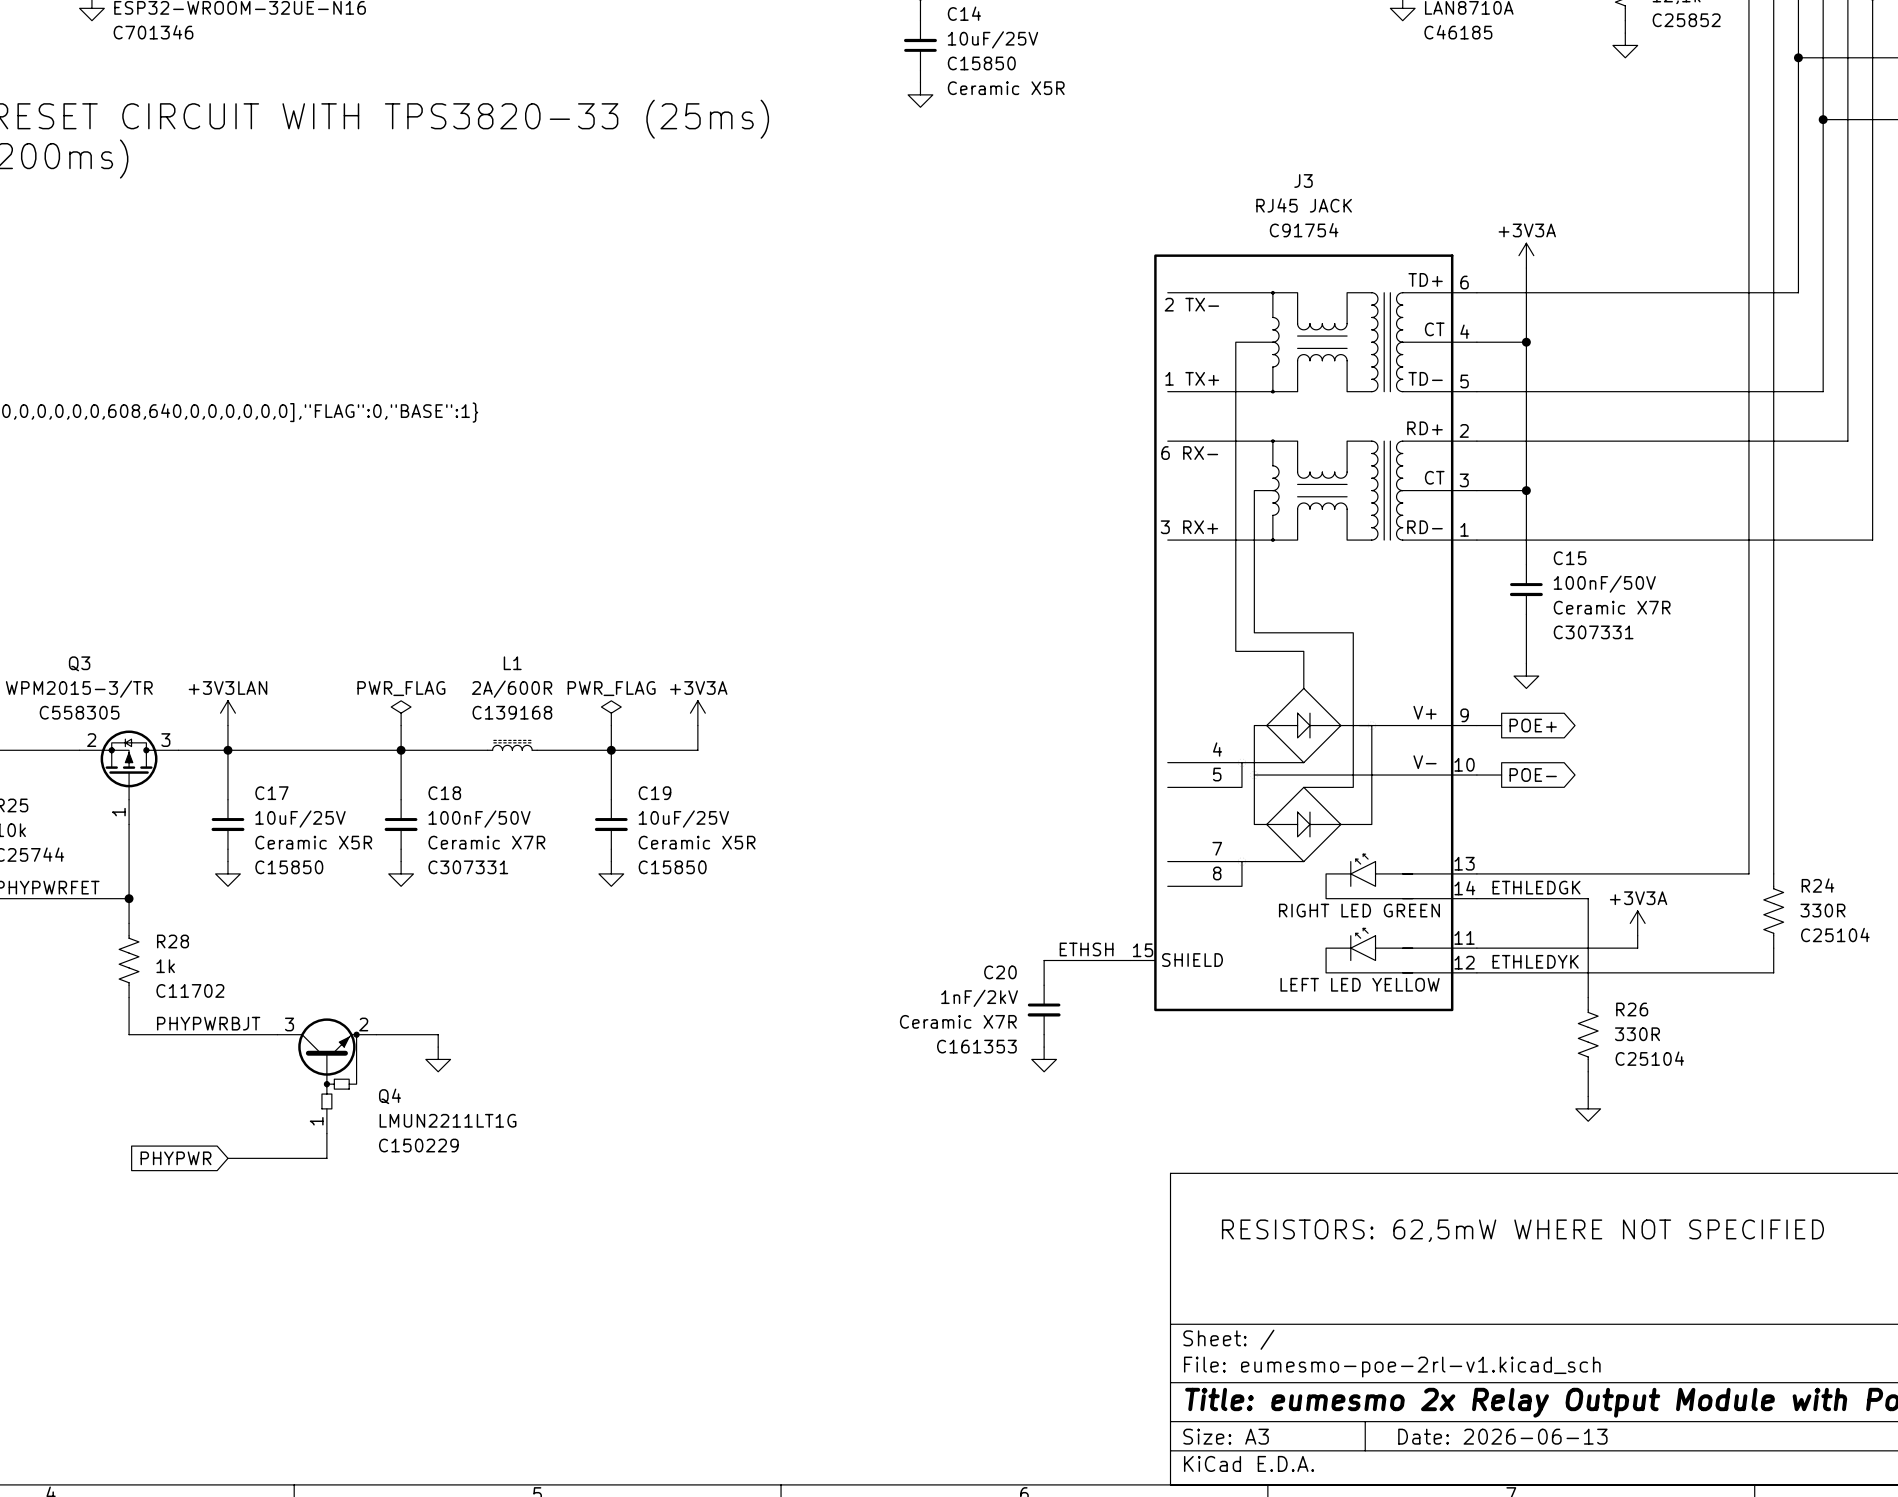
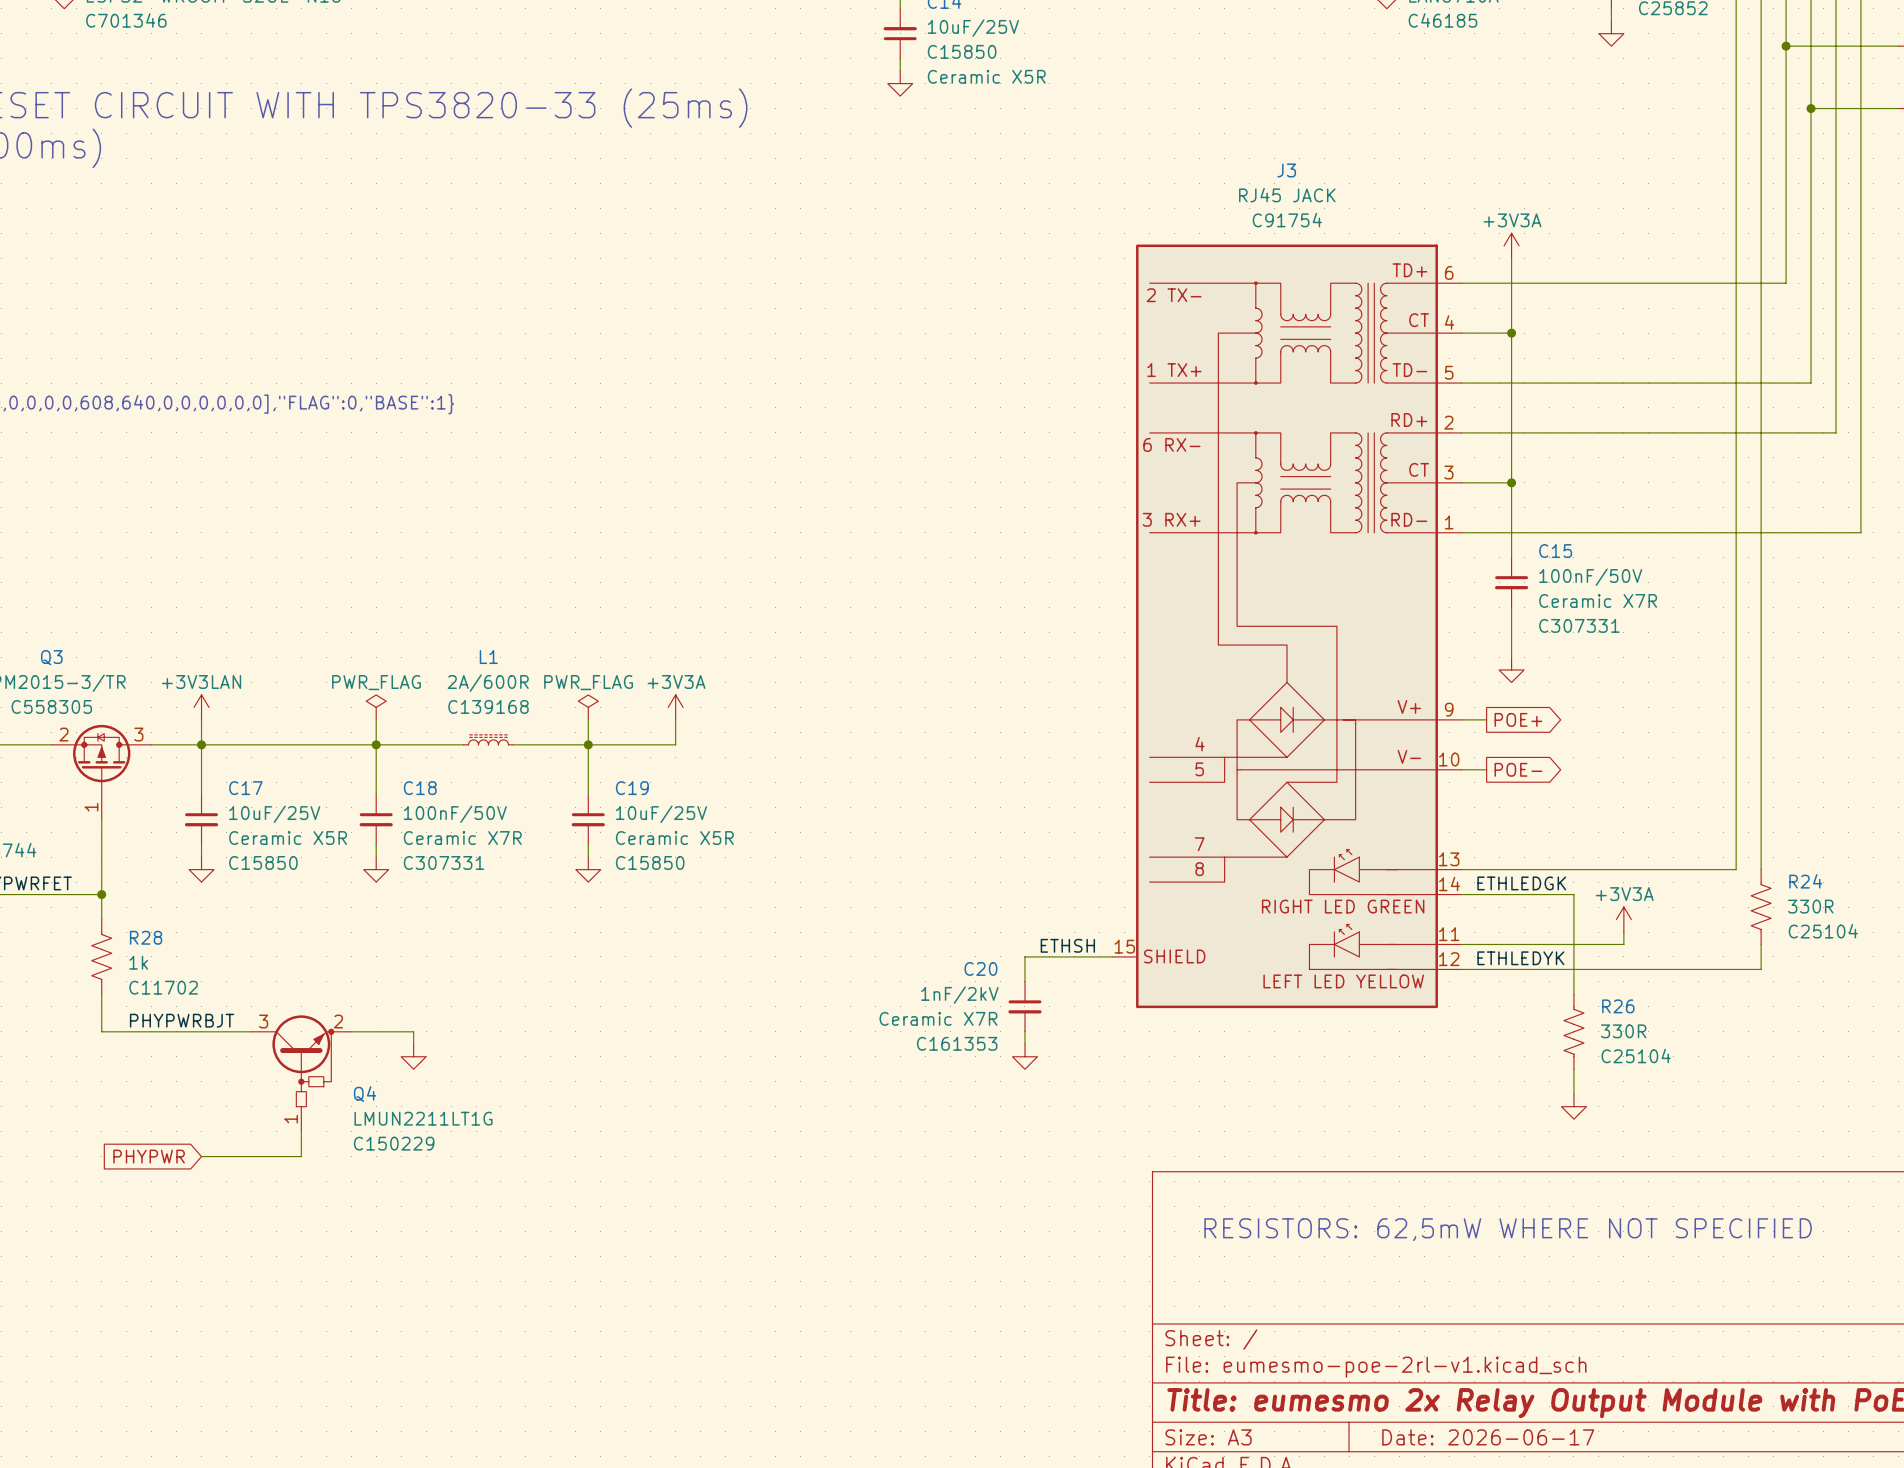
title block: Date: 2026-06-13 (1502, 1436) -> Date: 2026-06-17 (1488, 1437)

